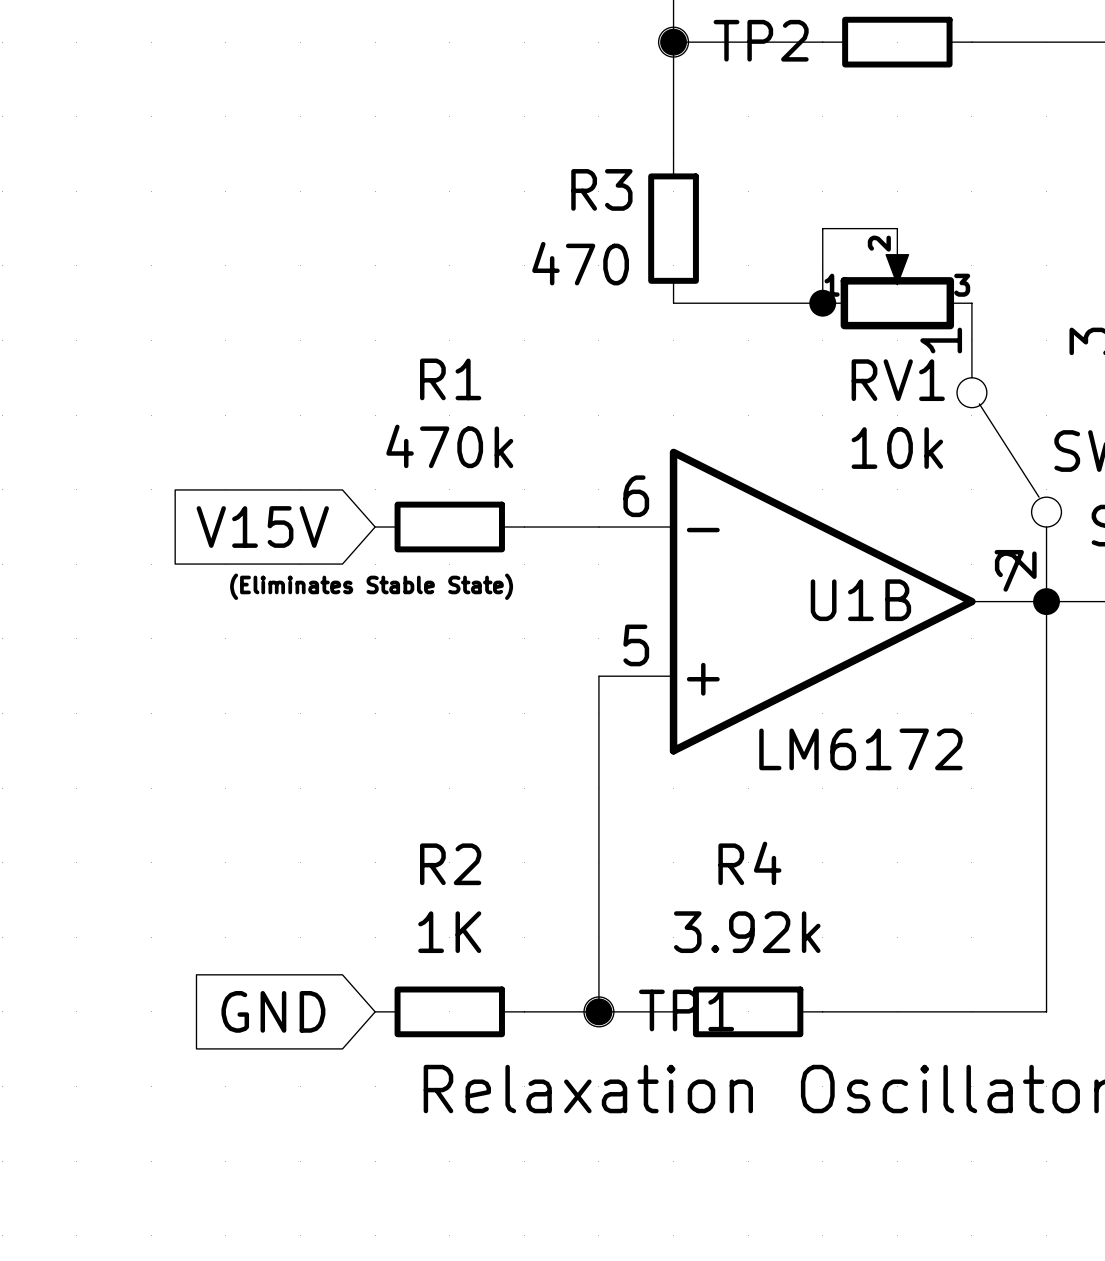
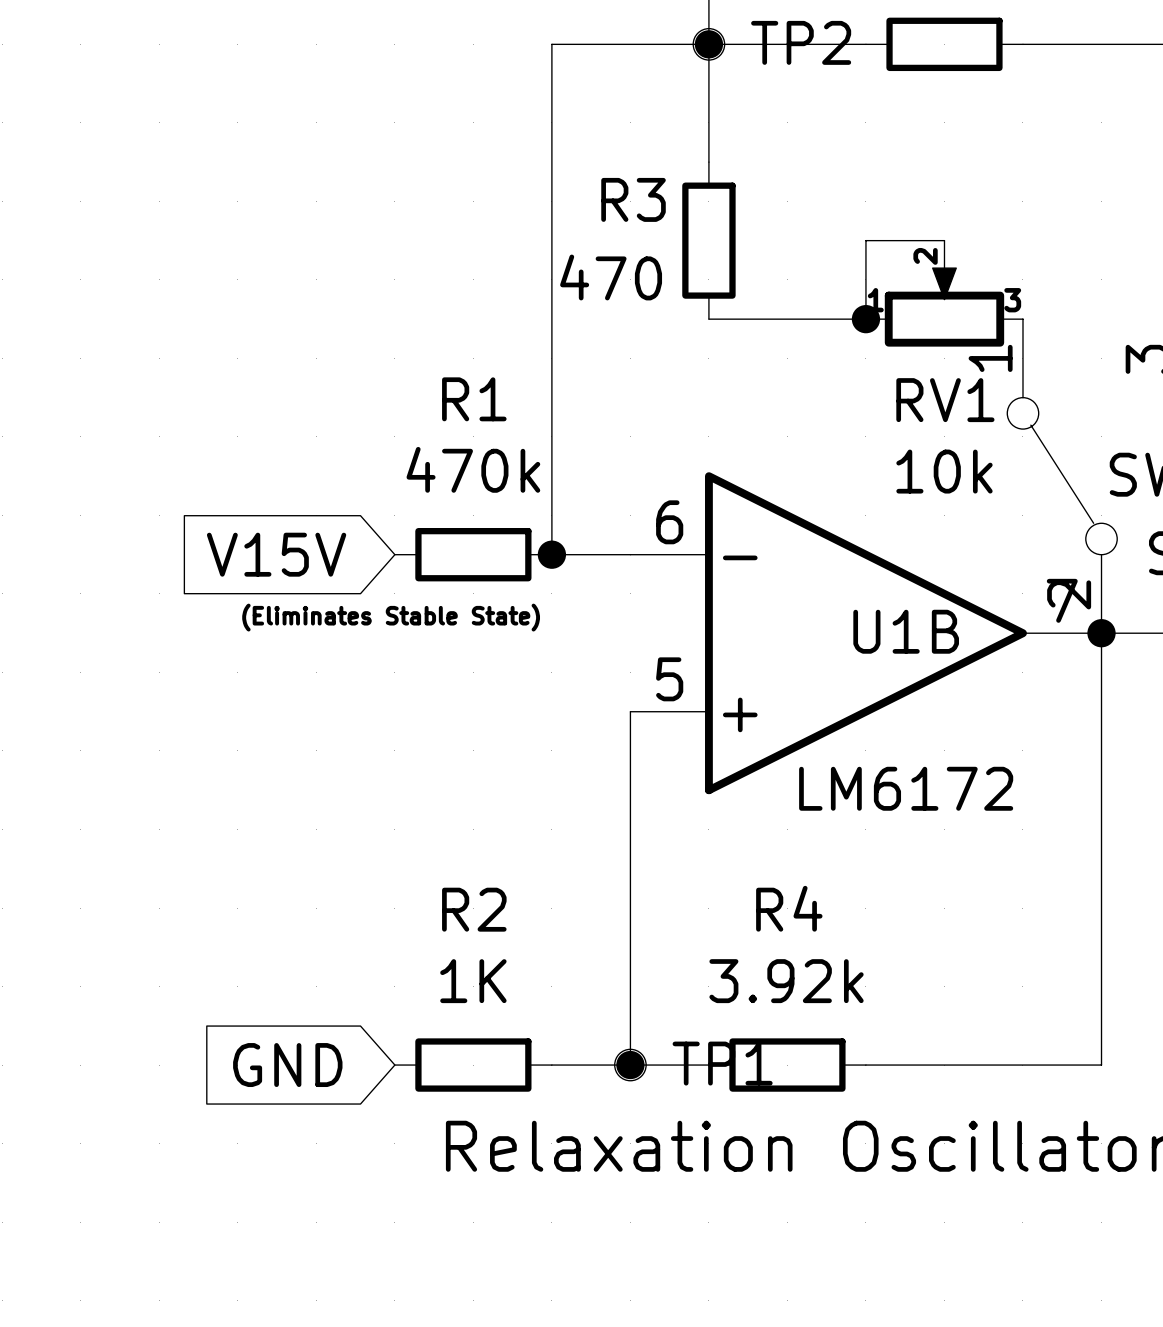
wire: none -> (708, 44) (551, 44) (551, 554)
junction: none -> (551, 554)

